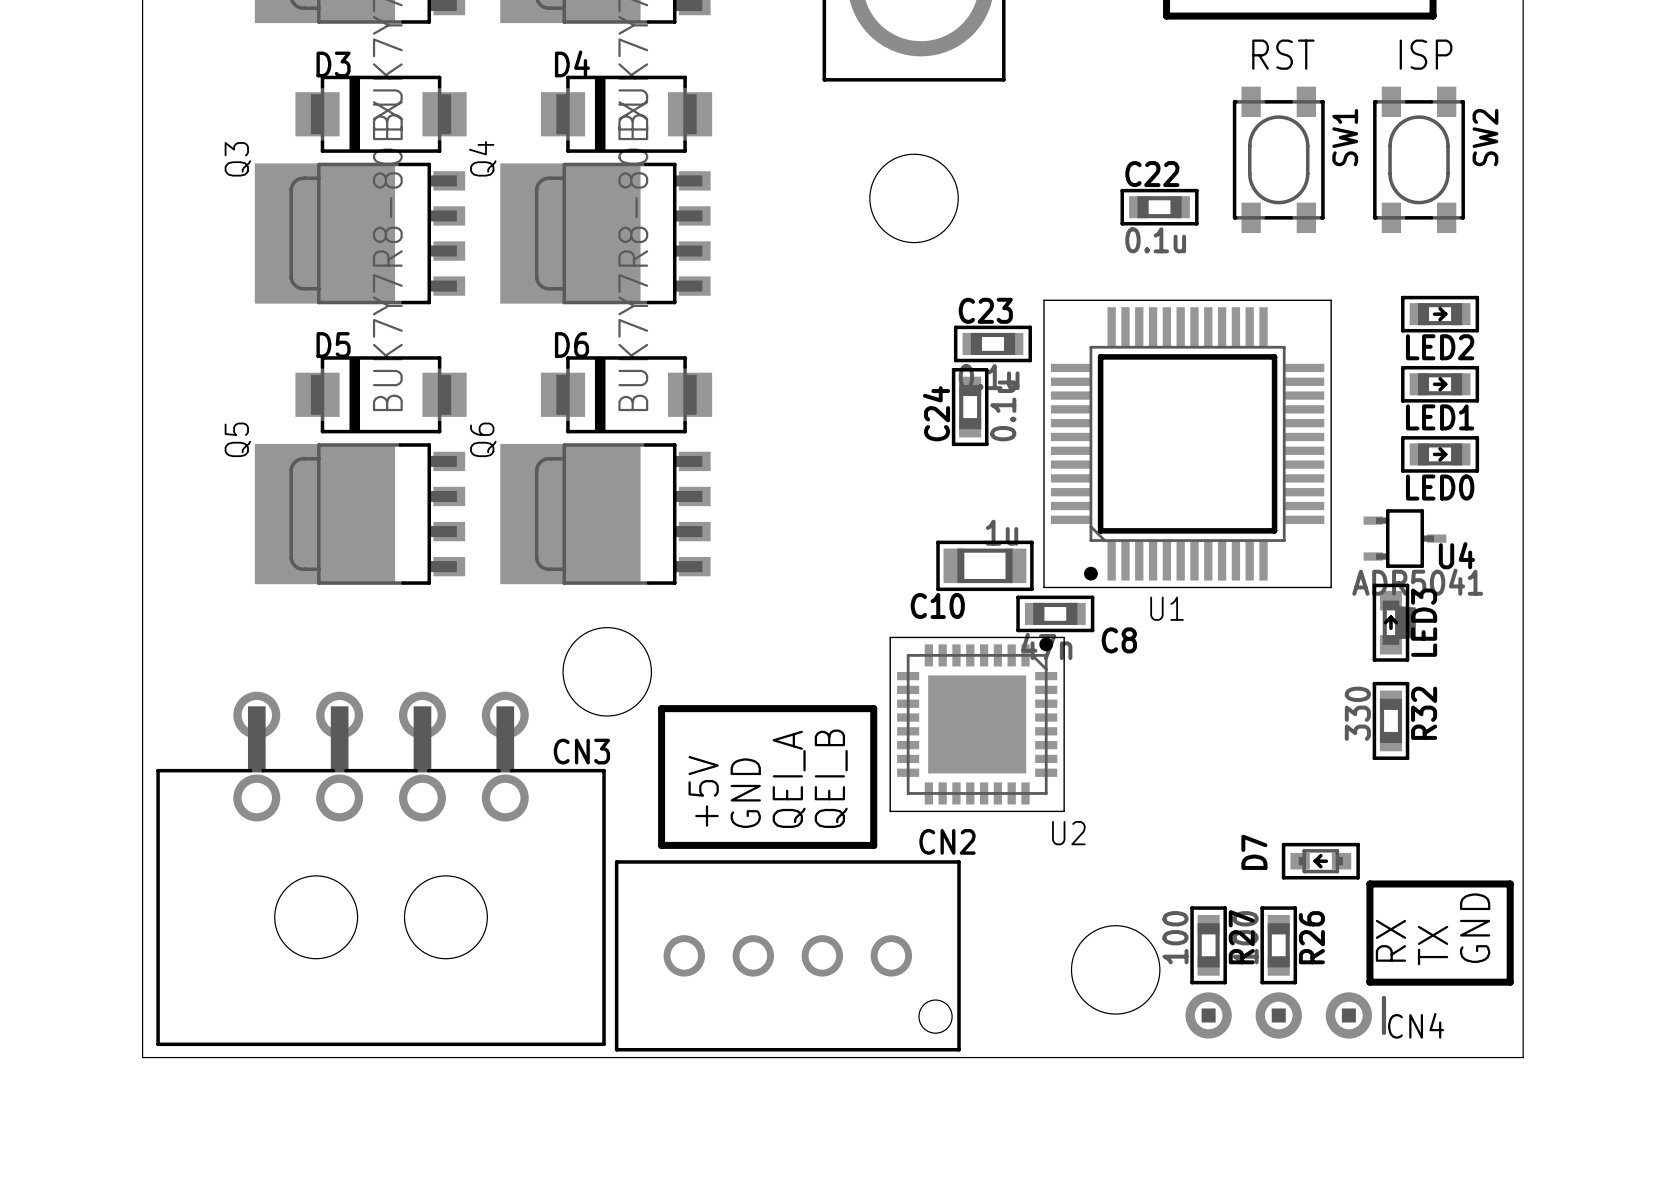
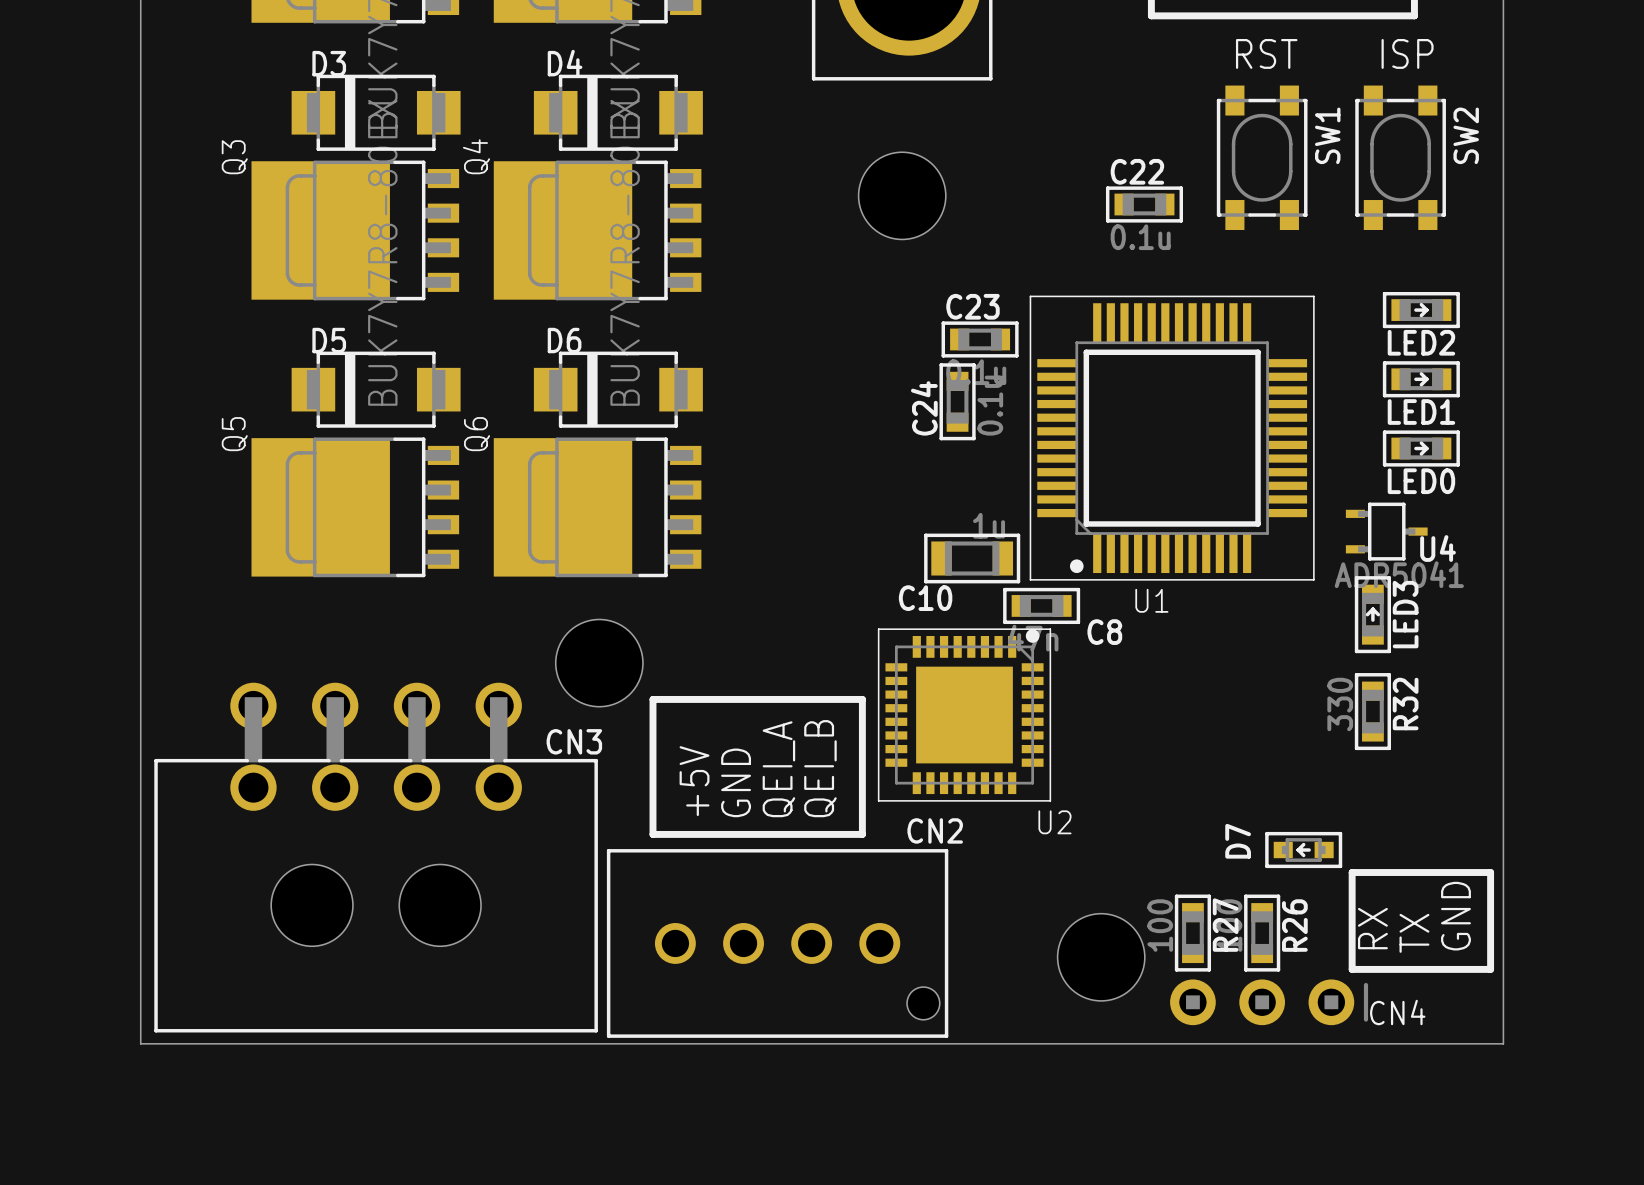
LED3 footprint: [1372, 583, 1416, 662] -> [1354, 576, 1392, 654]

